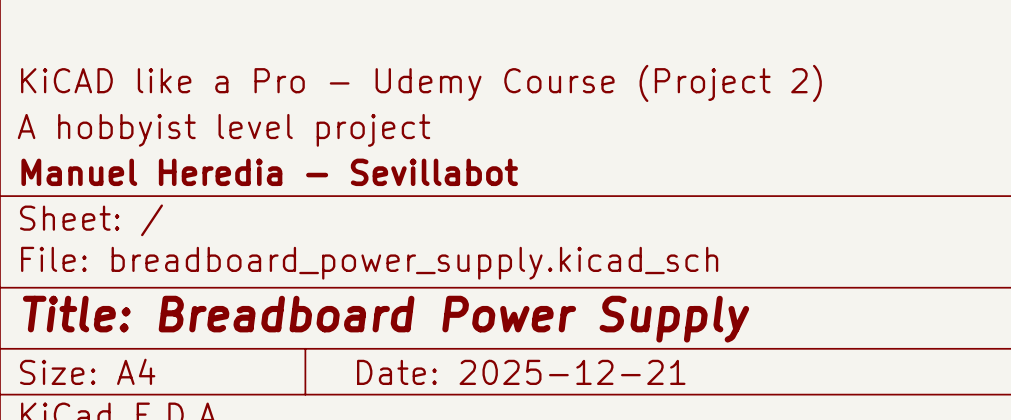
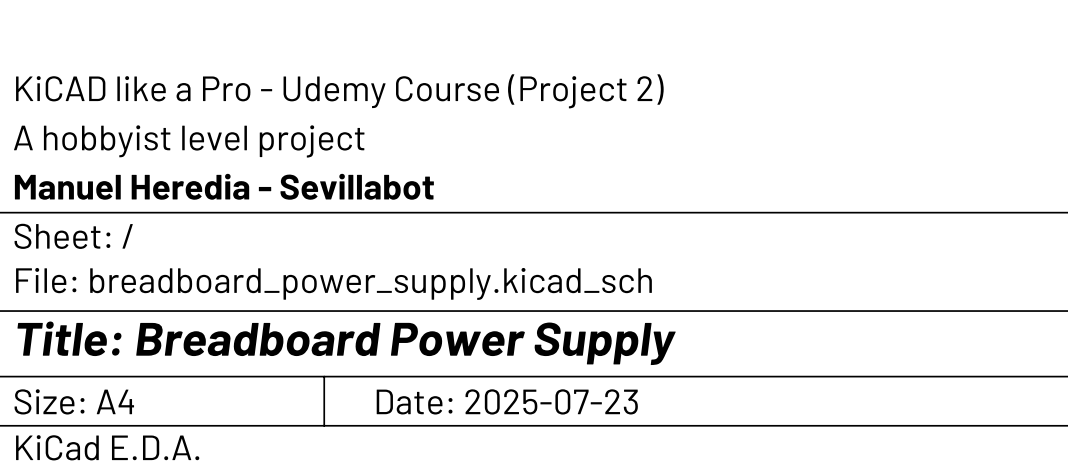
title block: Date: 2025-12-21 (521, 372) -> Date: 2025-07-23 (507, 401)

